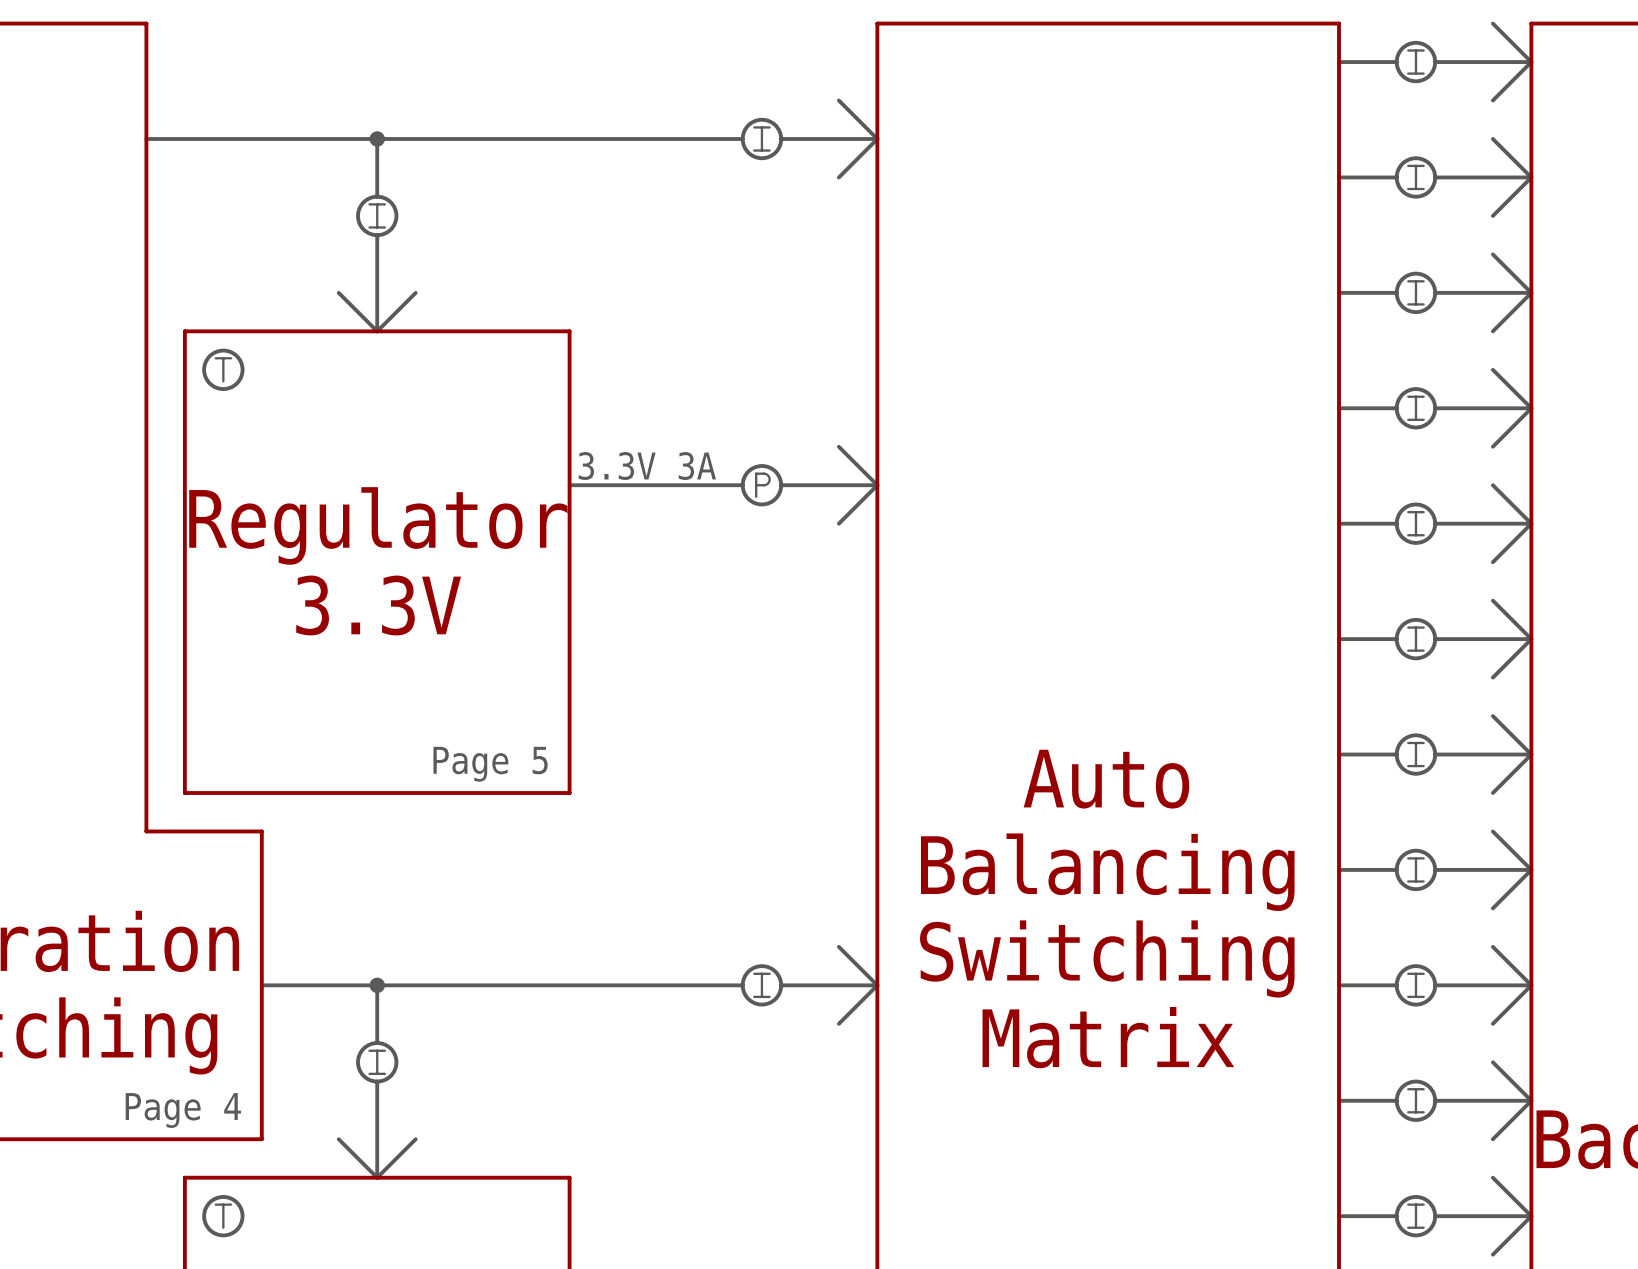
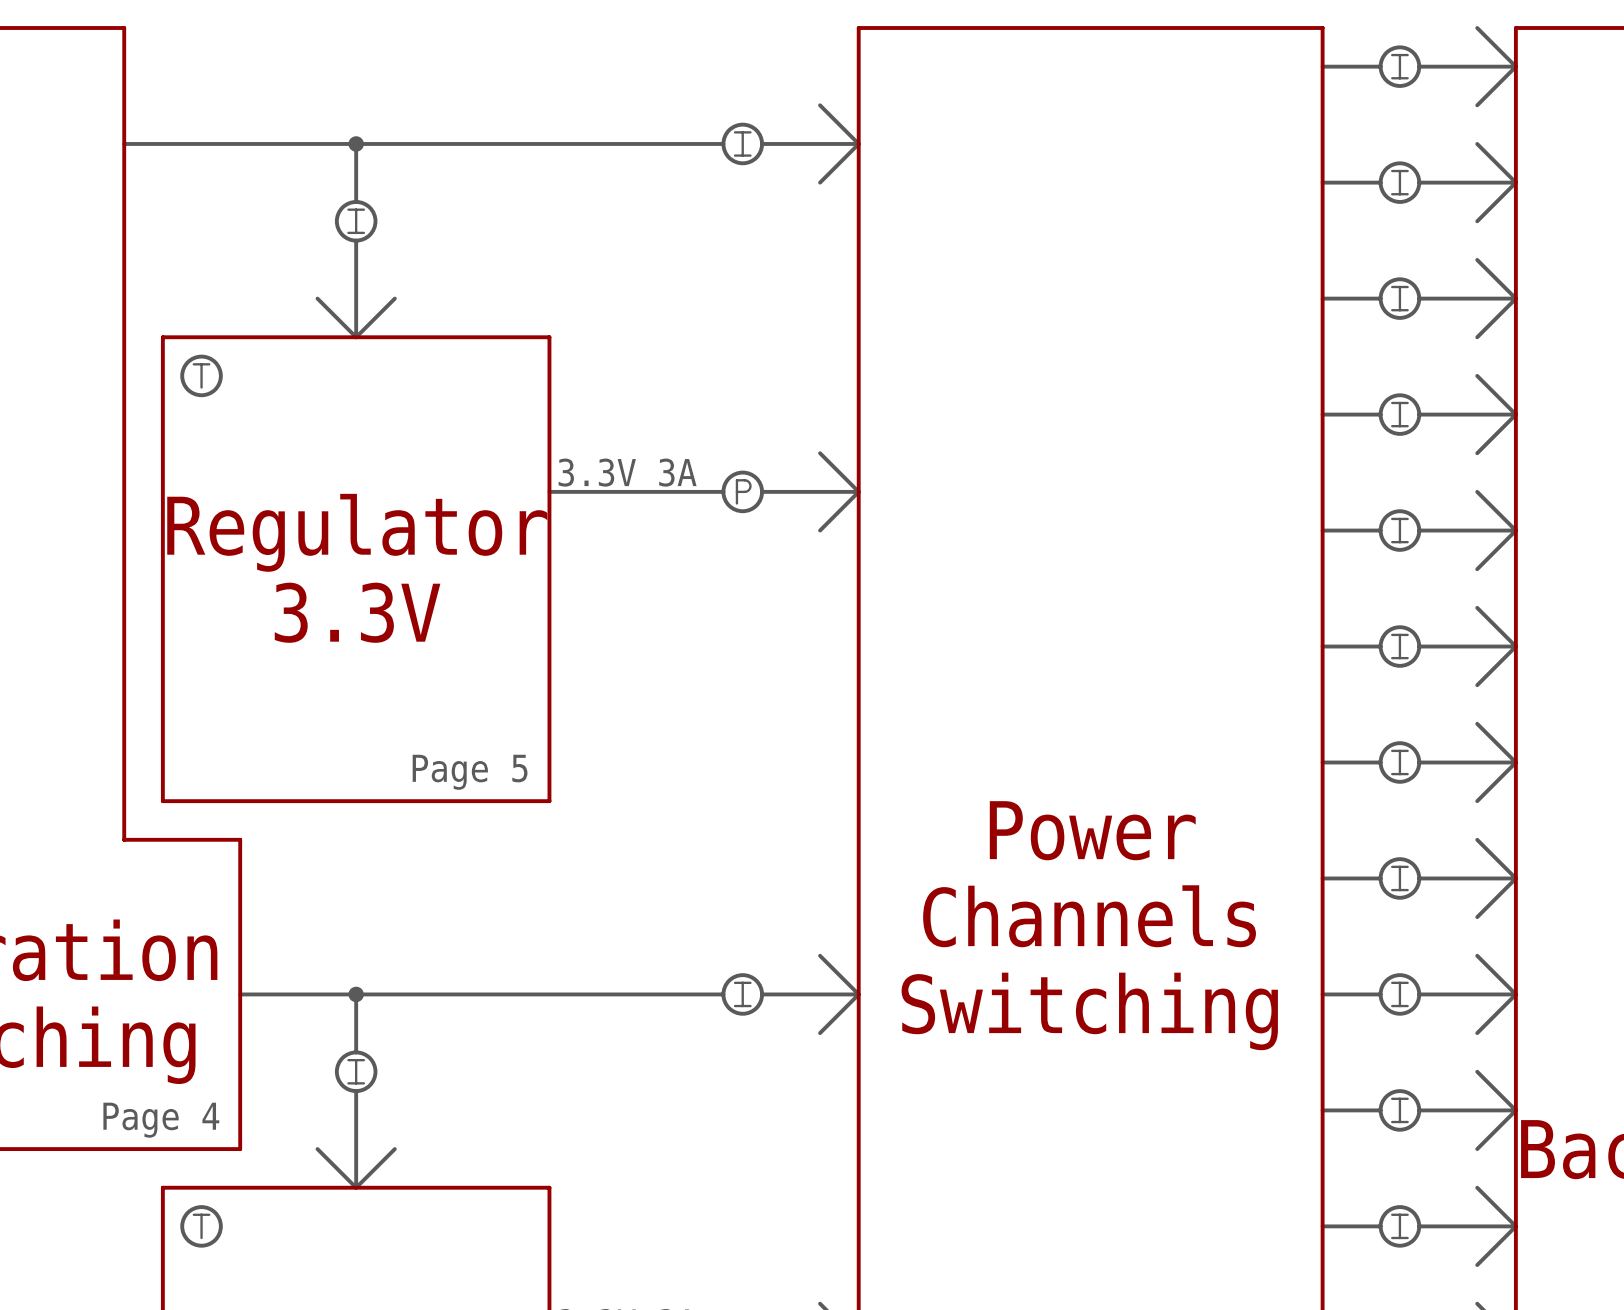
text: Auto (1106, 779) -> none
text: none -> Power (1092, 830)
text: Balancing (1107, 872) -> none
text: none -> Channels (1089, 916)
text position: Switching (1107, 958) -> Switching (1089, 1011)
text: Matrix (1108, 1037) -> none

